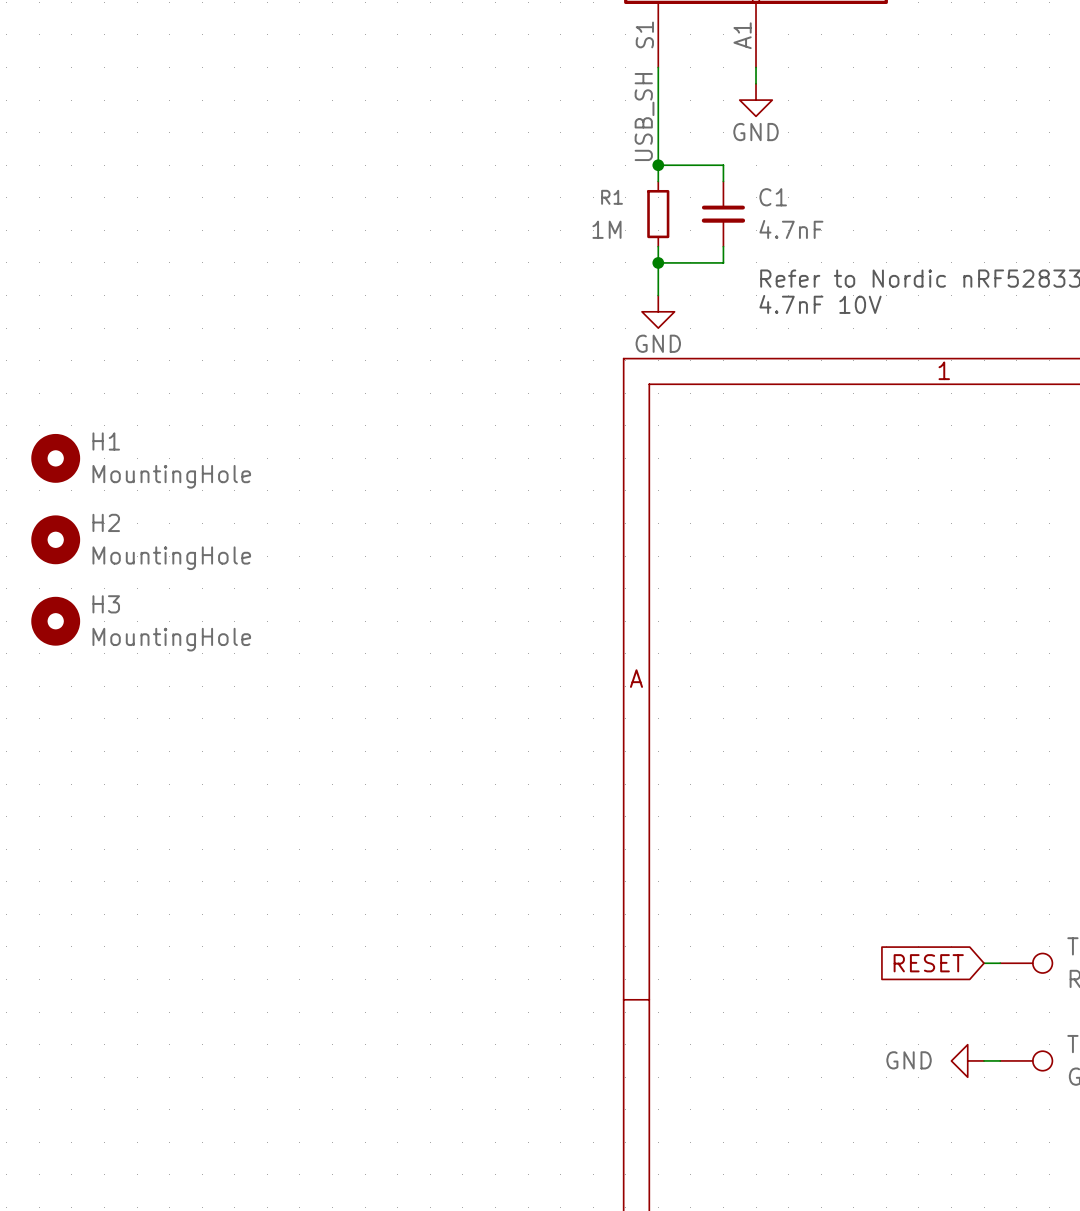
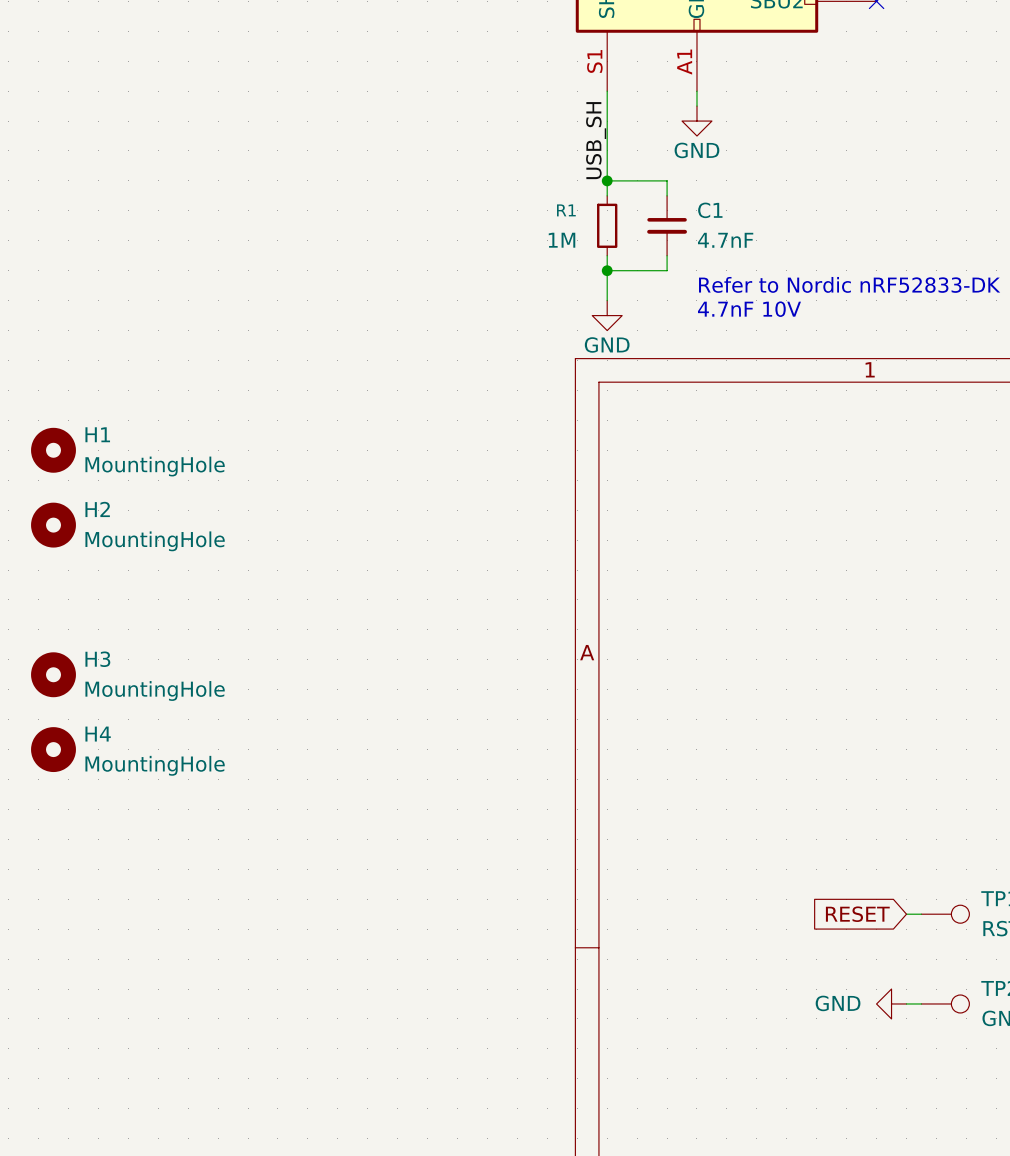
H3 position: (55, 621) -> (53, 674)
H4: none -> MountingHole (53, 749)

